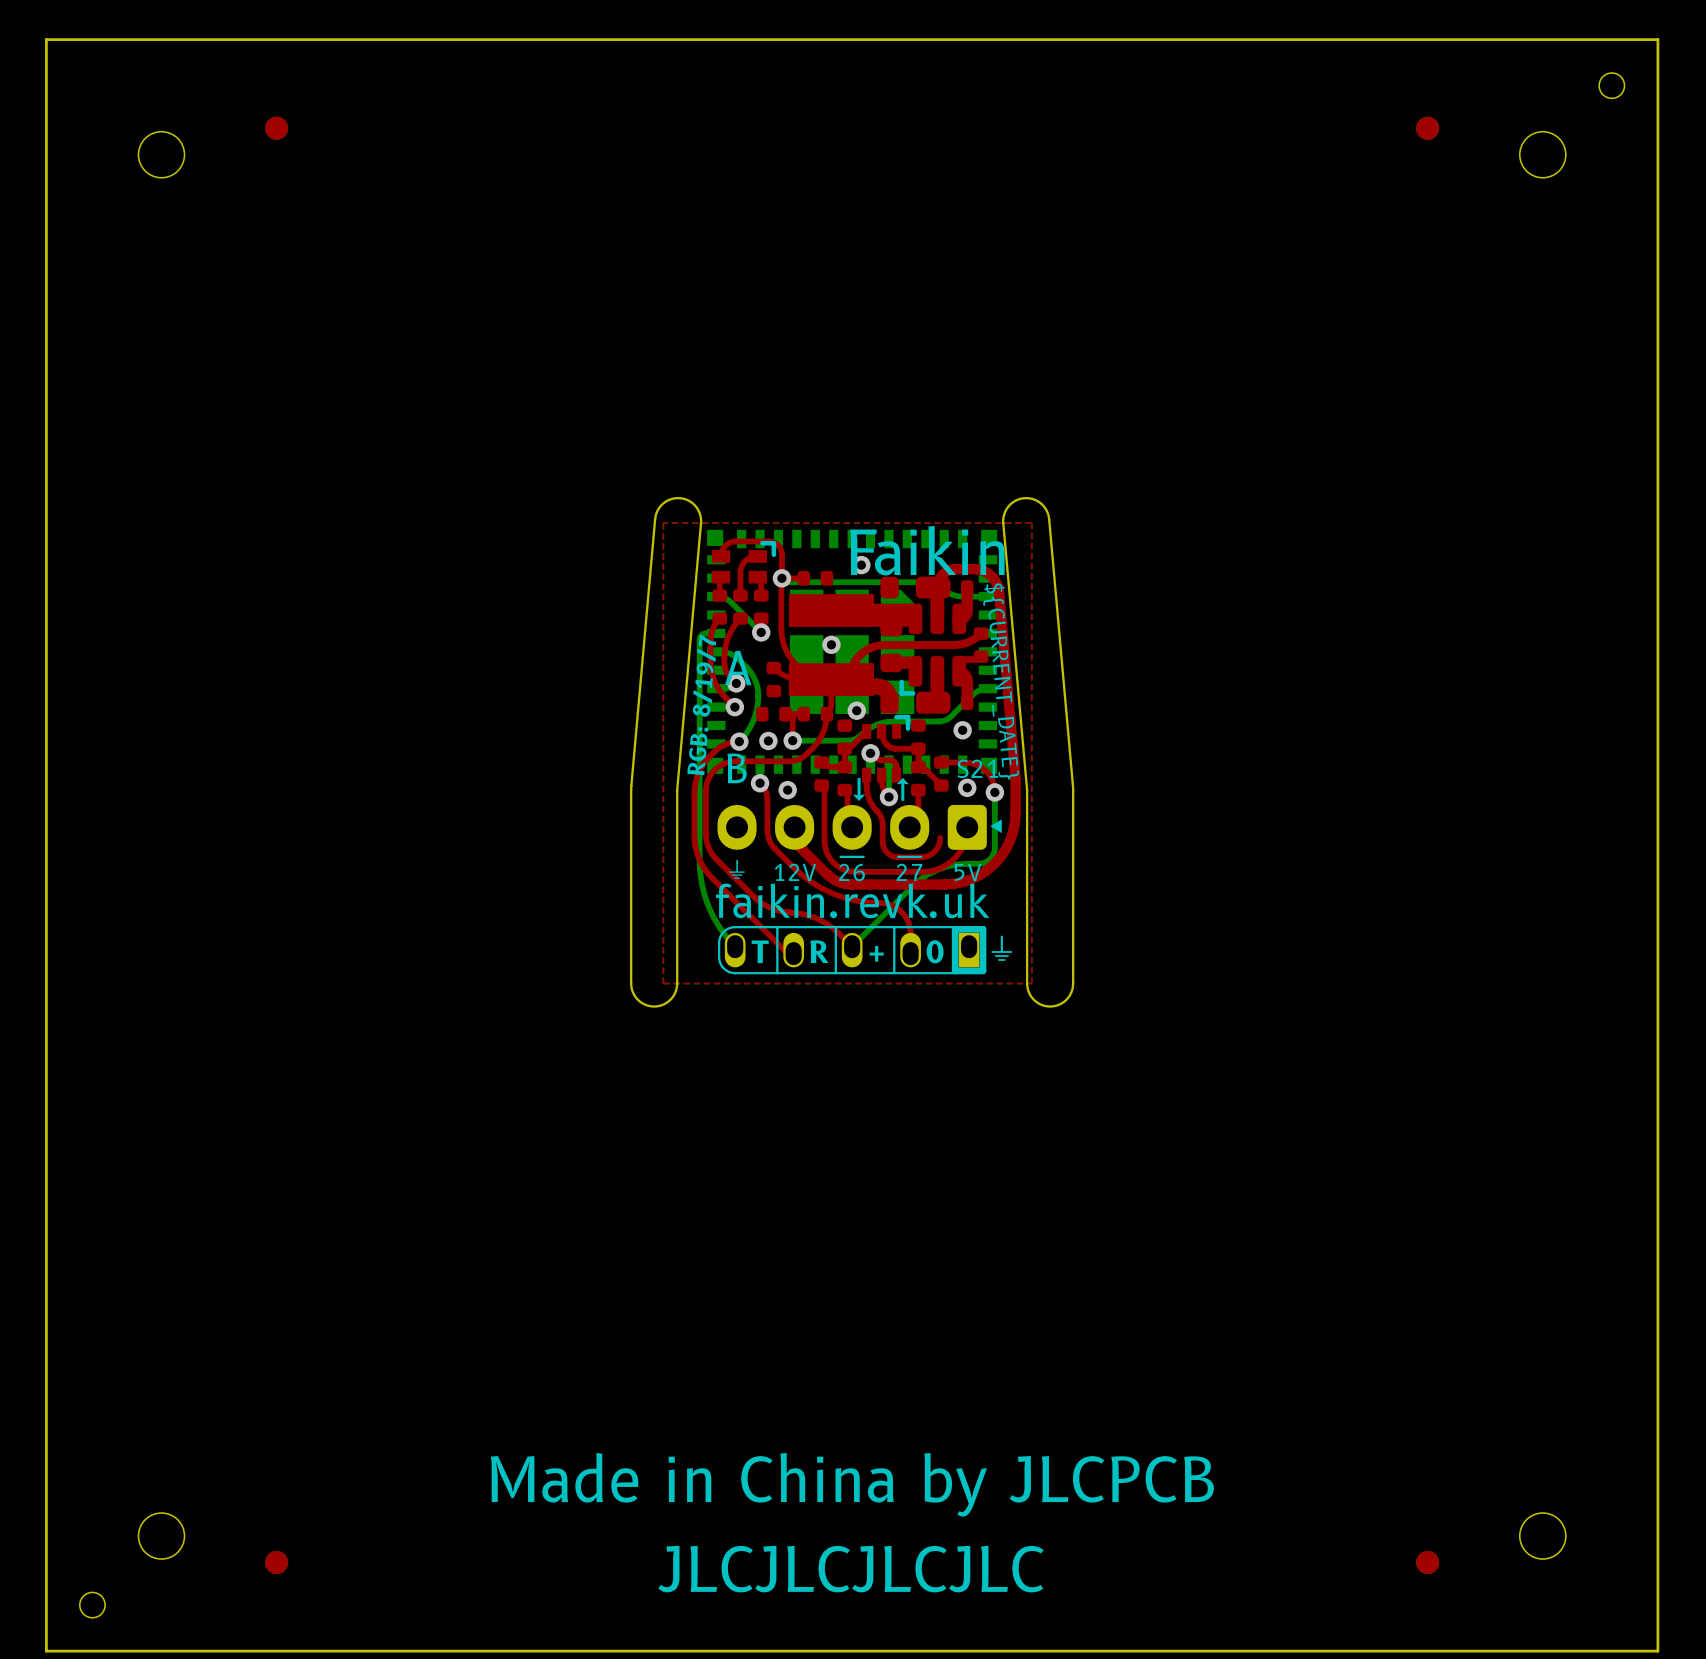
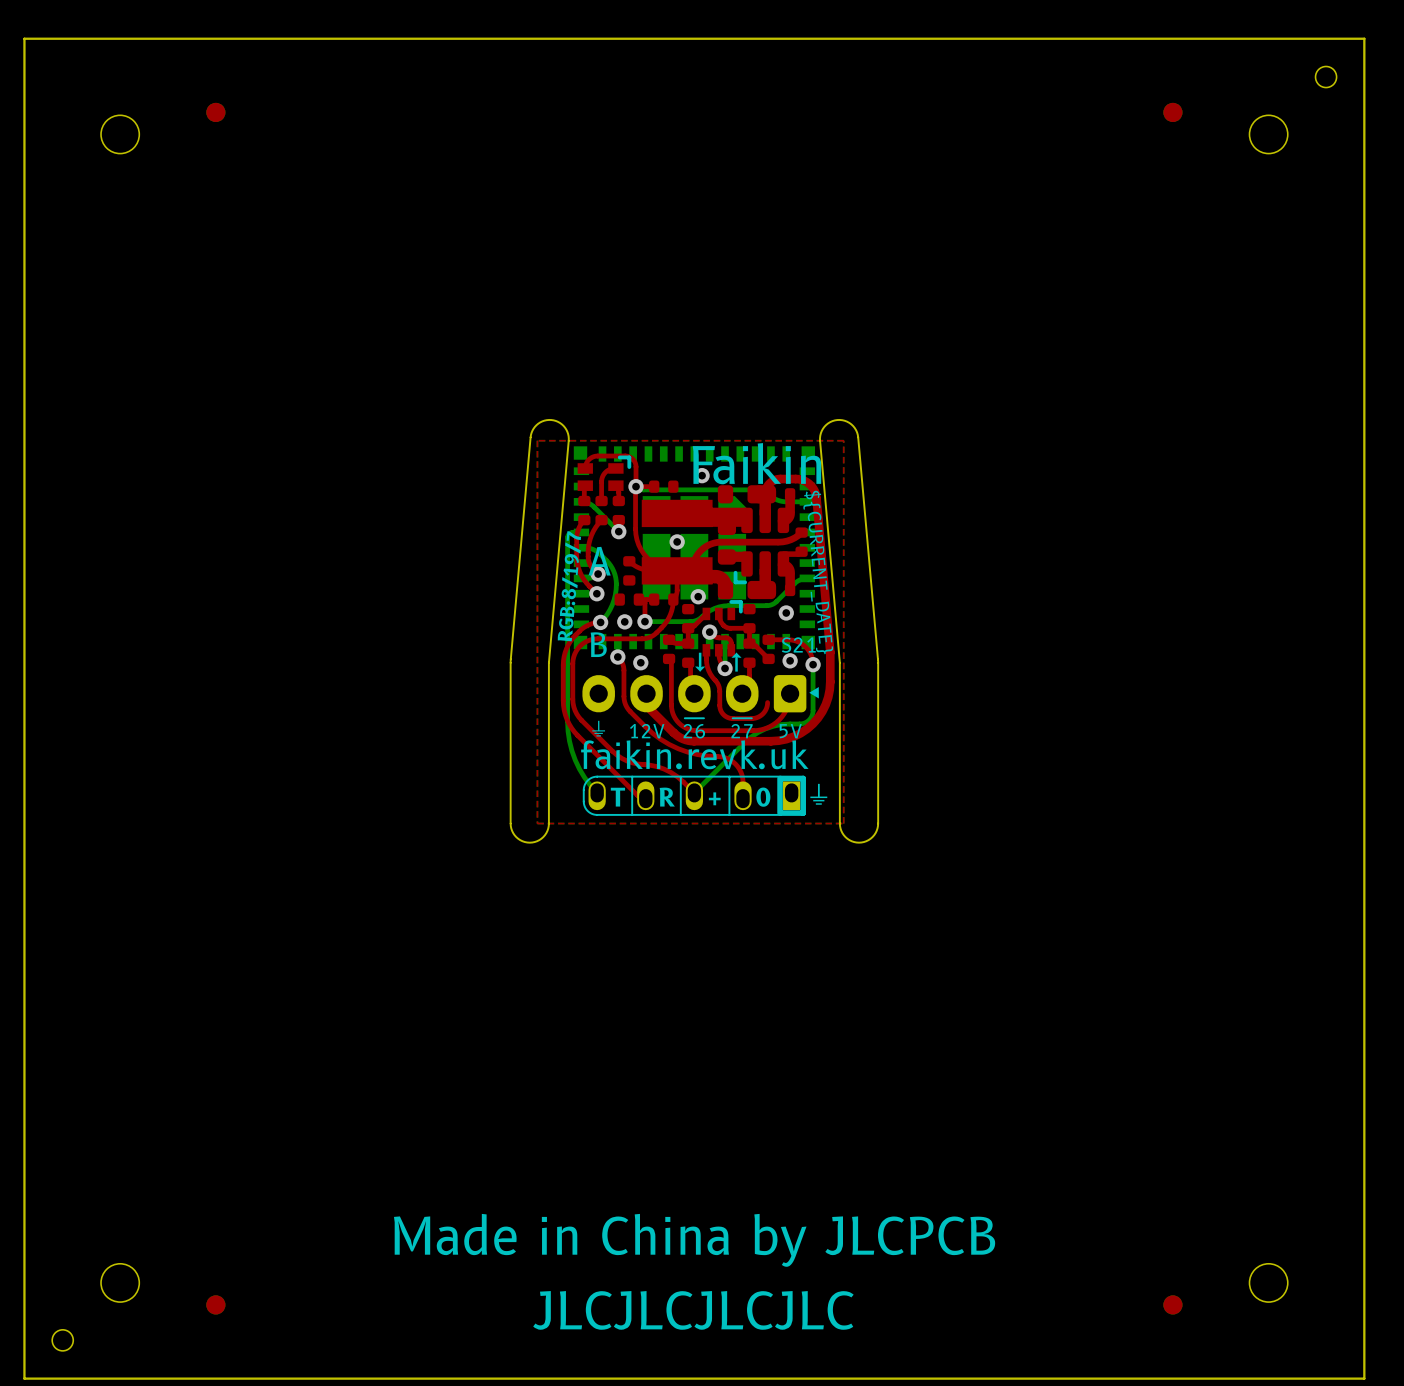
text: RGB: 8/19/7 (701, 705) -> RGB:8/19/7 (569, 586)

